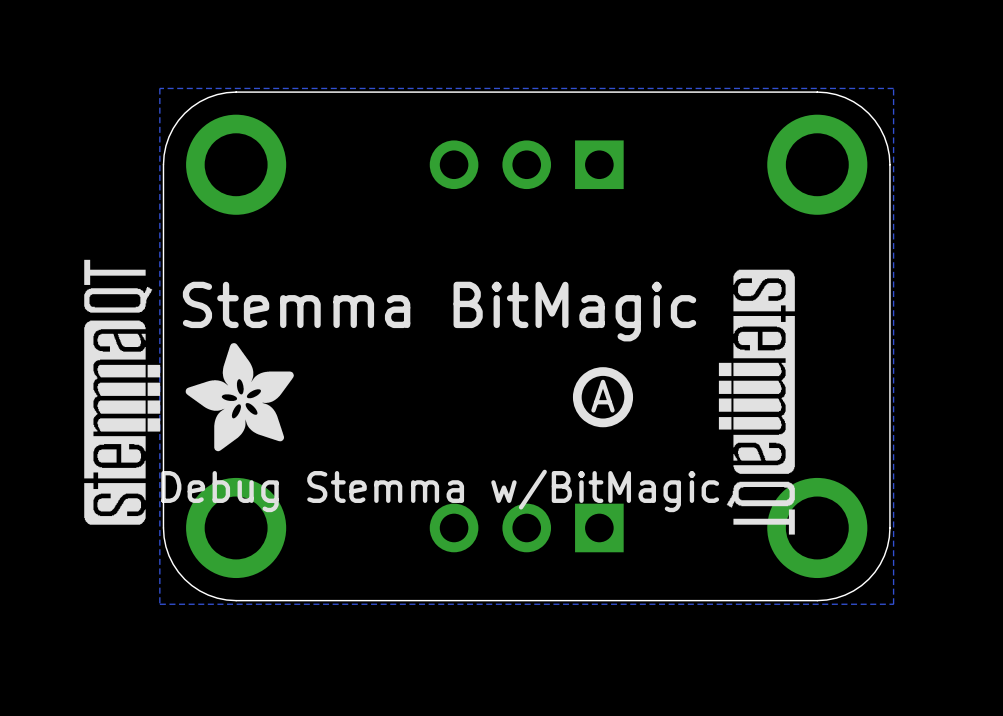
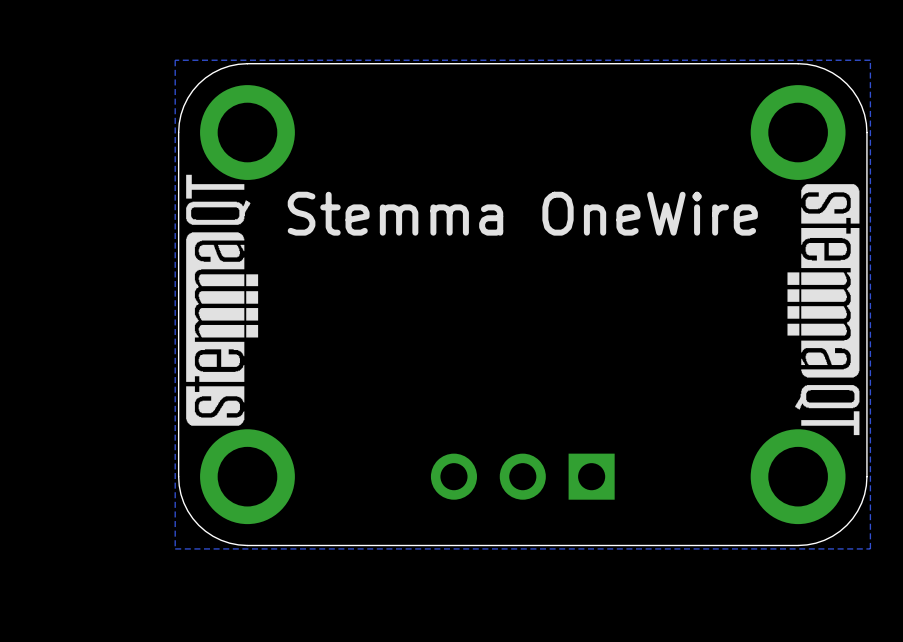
part: (526, 164) -> none
text: none -> Stemma OneWire (522, 213)
text: Stemma BitMagic (439, 311) -> none
drawing: [185, 343, 294, 452] -> none
drawing: [572, 367, 634, 428] -> none
drawing position: (122, 392) -> (222, 300)
text: A (603, 396) -> none
drawing position: (756, 402) -> (823, 309)
text: Debug Stemma w/BitMagic (440, 490) -> none

